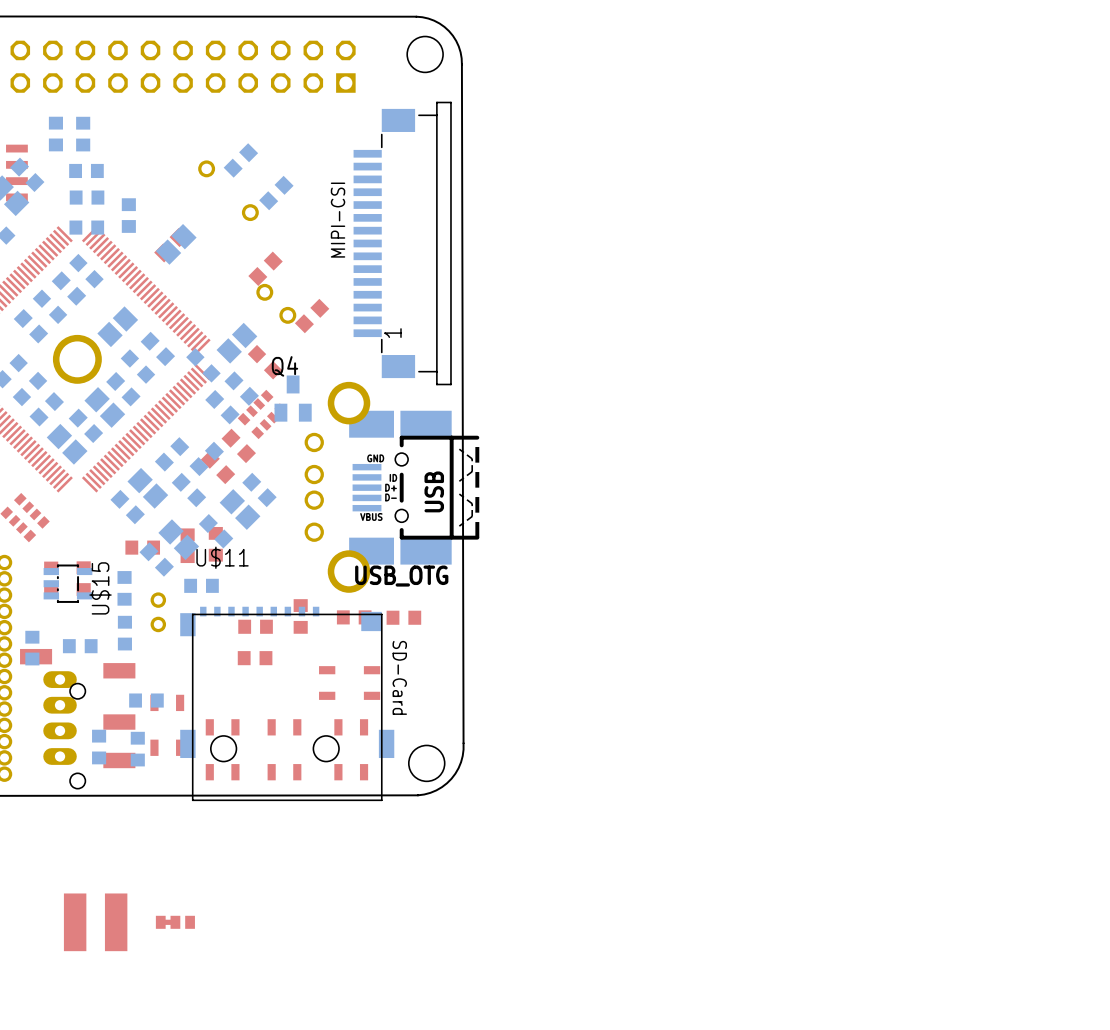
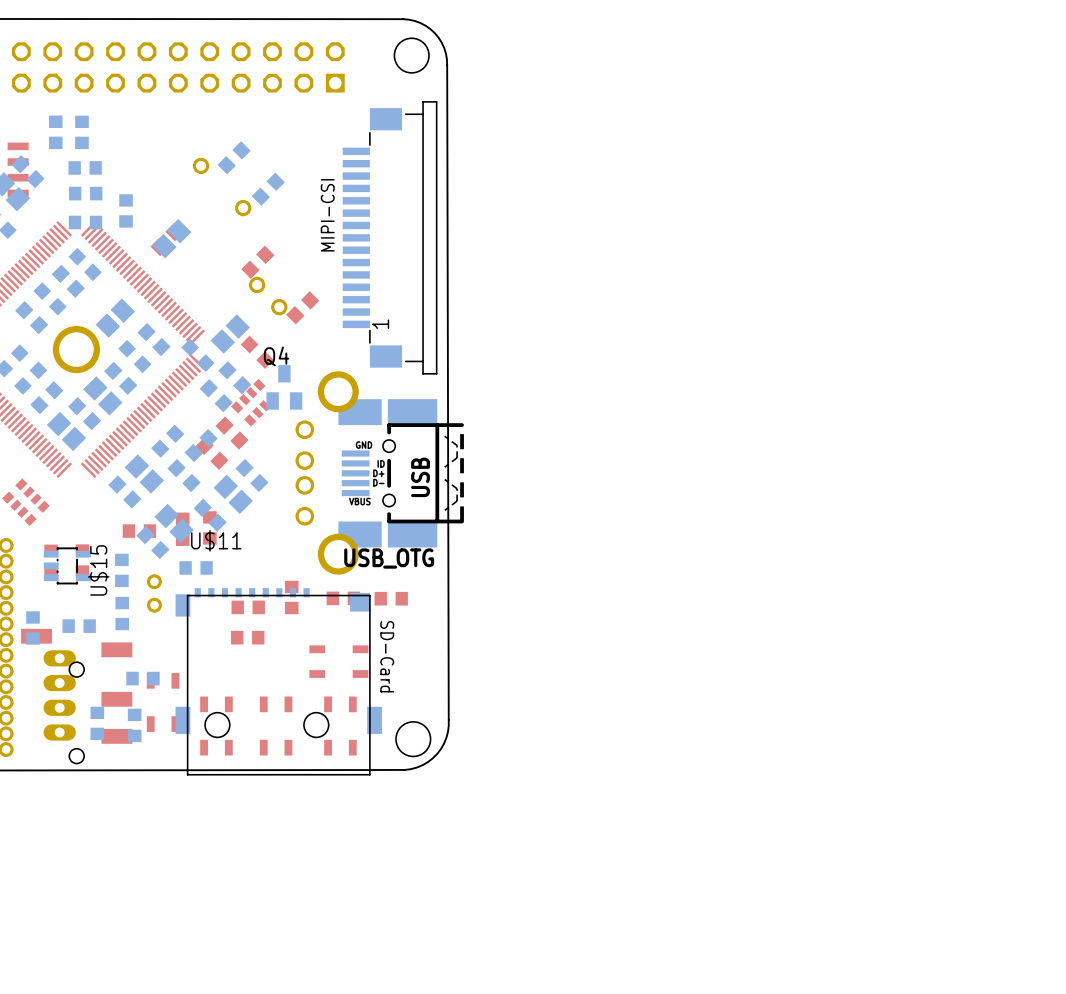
part: (95, 922) -> none
part: (175, 922) -> none

